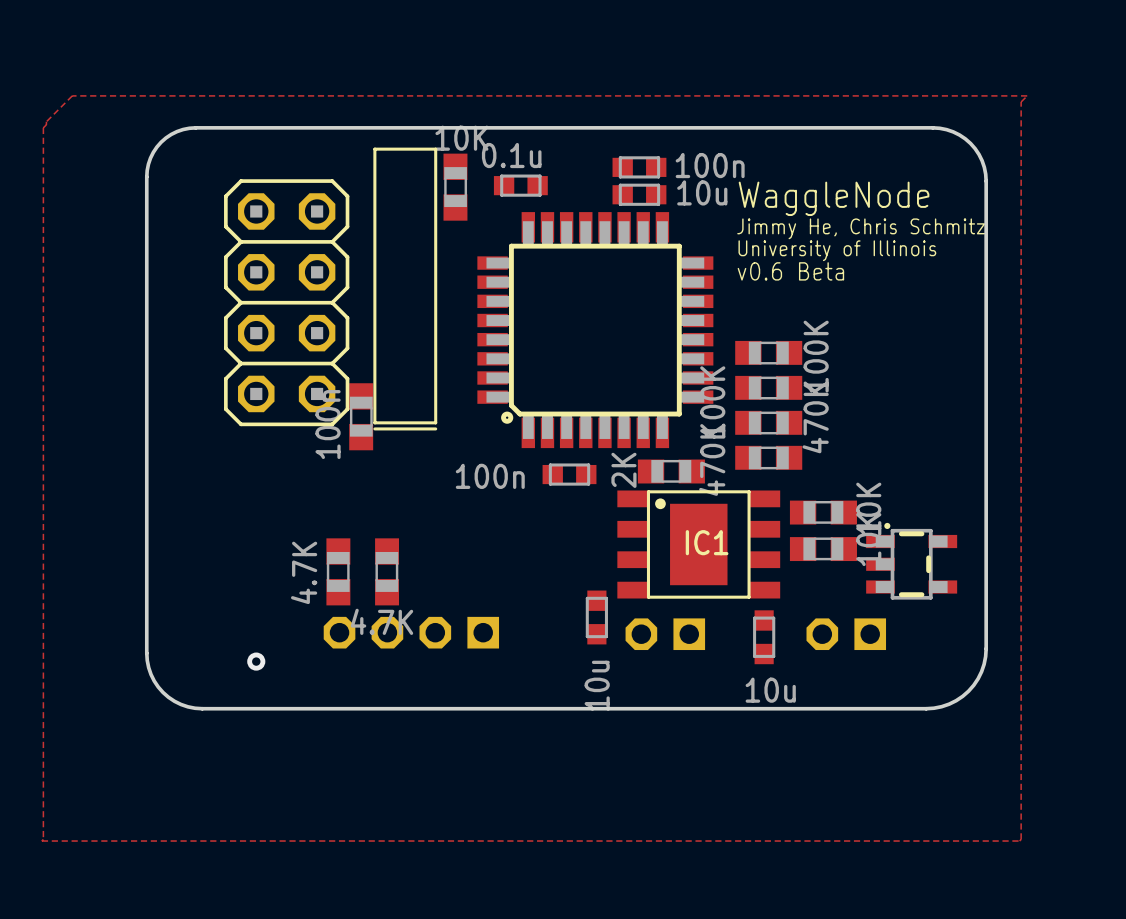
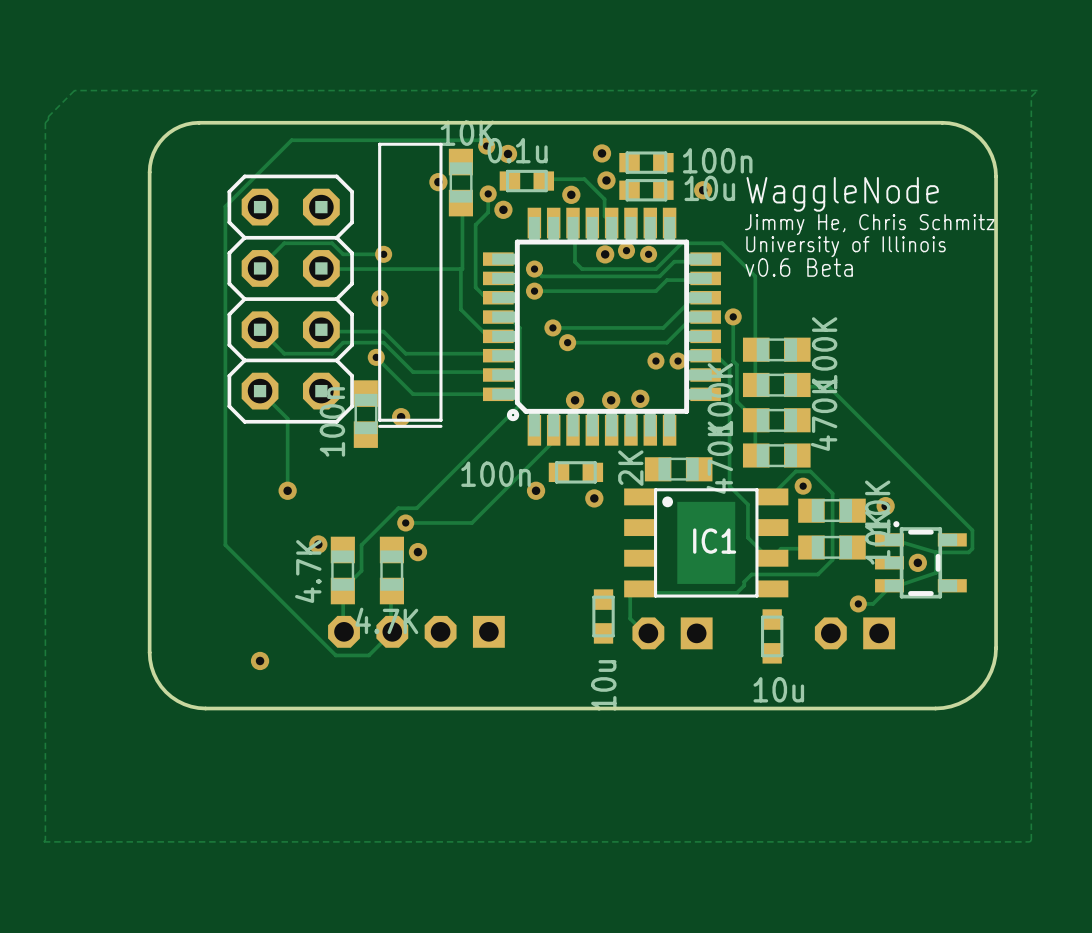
track: none -> (486, 146) (479, 140) (291, 140) (225, 206) (225, 545) (335, 655) (368, 655) (391, 633) (391, 591)
via: none -> (486, 146)
via: none -> (508, 153)
via: none -> (601, 153)
track: none -> (545, 176) (548, 179) (584, 179) (604, 199) (604, 216) (611, 223)
via: none -> (606, 180)
via: none -> (438, 182)
via: none -> (703, 190)
track: none -> (488, 193) (488, 212) (475, 224) (475, 287) (483, 294) (497, 294) (498, 297)
via: none -> (488, 193)
via: none -> (571, 194)
track: none -> (462, 203) (462, 269) (321, 268)
via: none -> (503, 209)
track: none -> (573, 223) (575, 224) (575, 262) (582, 269) (655, 269) (681, 243) (722, 243) (755, 276) (756, 384)
via: none -> (626, 250)
track: none -> (383, 254) (343, 254) (332, 243) (284, 243) (260, 268)
via: none -> (383, 254)
via: none -> (605, 254)
via: none -> (648, 254)
track: none -> (705, 259) (703, 261) (674, 261) (659, 276) (541, 276) (534, 269)
track: none -> (460, 269) (460, 309) (486, 335) (498, 336)
via: none -> (534, 269)
track: none -> (705, 278) (703, 280) (667, 280) (655, 291) (534, 291)
via: none -> (534, 291)
track: none -> (705, 297) (692, 298) (663, 327) (552, 327)
via: none -> (379, 298)
track: none -> (498, 317) (501, 320) (512, 320) (519, 327) (519, 405) (416, 508) (398, 508) (361, 545) (361, 570) (343, 589) (344, 631)
track: none -> (705, 317) (703, 320) (689, 320) (667, 342) (567, 342)
track: none -> (733, 316) (733, 361) (736, 364) (736, 401) (756, 420) (756, 455)
via: none -> (733, 316)
via: none -> (552, 327)
track: none -> (260, 329) (284, 353) (332, 353) (343, 342) (383, 342) (413, 372) (497, 372) (498, 375)
track: none -> (321, 329) (324, 331) (383, 331) (405, 353) (497, 353) (498, 355)
via: none -> (567, 342)
track: none -> (705, 355) (718, 357) (729, 368) (729, 486) (747, 504) (747, 537) (770, 559) (781, 548) (811, 547)
track: none -> (376, 357) (413, 394) (498, 394)
via: none -> (376, 357)
via: none -> (655, 361)
via: none -> (678, 361)
track: none -> (797, 384) (799, 386) (828, 386) (972, 530) (972, 548) (968, 552) (935, 552)
track: none -> (260, 391) (287, 418) (287, 490)
via: none -> (640, 398)
via: none -> (575, 400)
via: none -> (611, 400)
via: none -> (401, 417)
track: none -> (553, 430) (552, 442) (471, 522) (405, 522)
via: none -> (803, 486)
via: none -> (287, 490)
via: none -> (536, 490)
track: none -> (772, 496) (795, 471) (810, 471) (832, 493) (832, 559) (817, 574) (751, 574) (736, 592) (637, 592) (639, 588)
via: none -> (594, 498)
via: none -> (885, 506)
via: none -> (405, 522)
track: none -> (889, 539) (935, 552)
via: none -> (318, 544)
via: none -> (417, 552)
track: none -> (935, 552) (935, 572) (898, 585) (889, 585) (873, 603) (858, 603)
via: none -> (917, 562)
track: none -> (630, 596) (630, 618) (644, 633) (648, 633)
via: none -> (858, 603)

